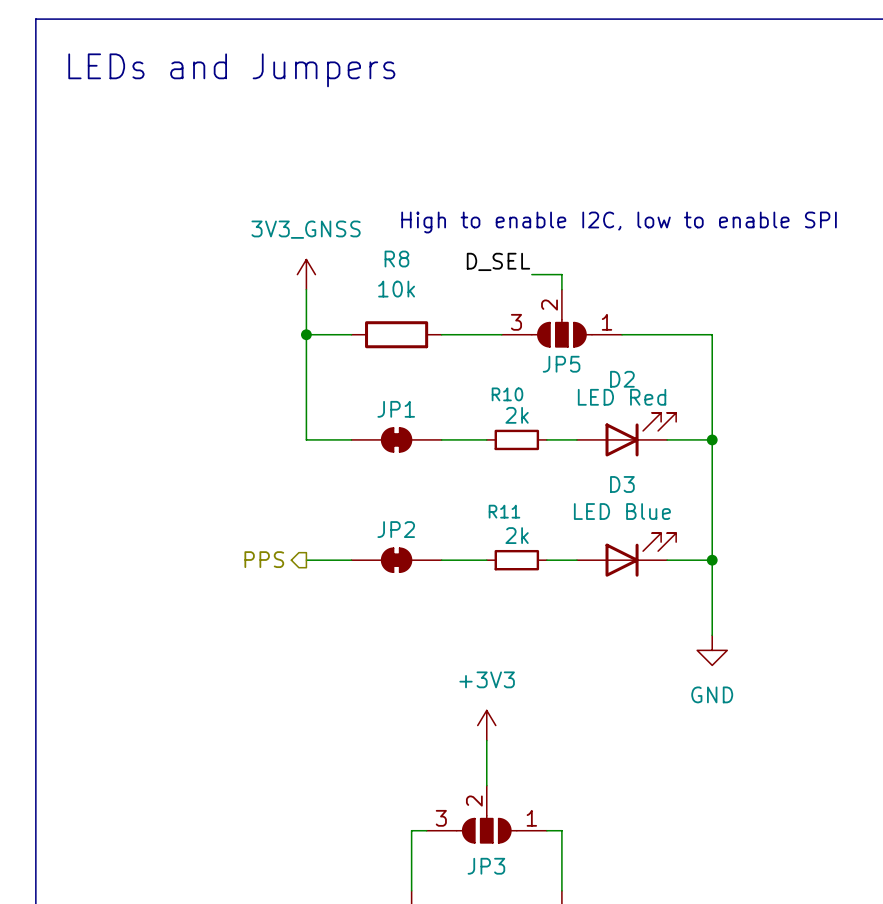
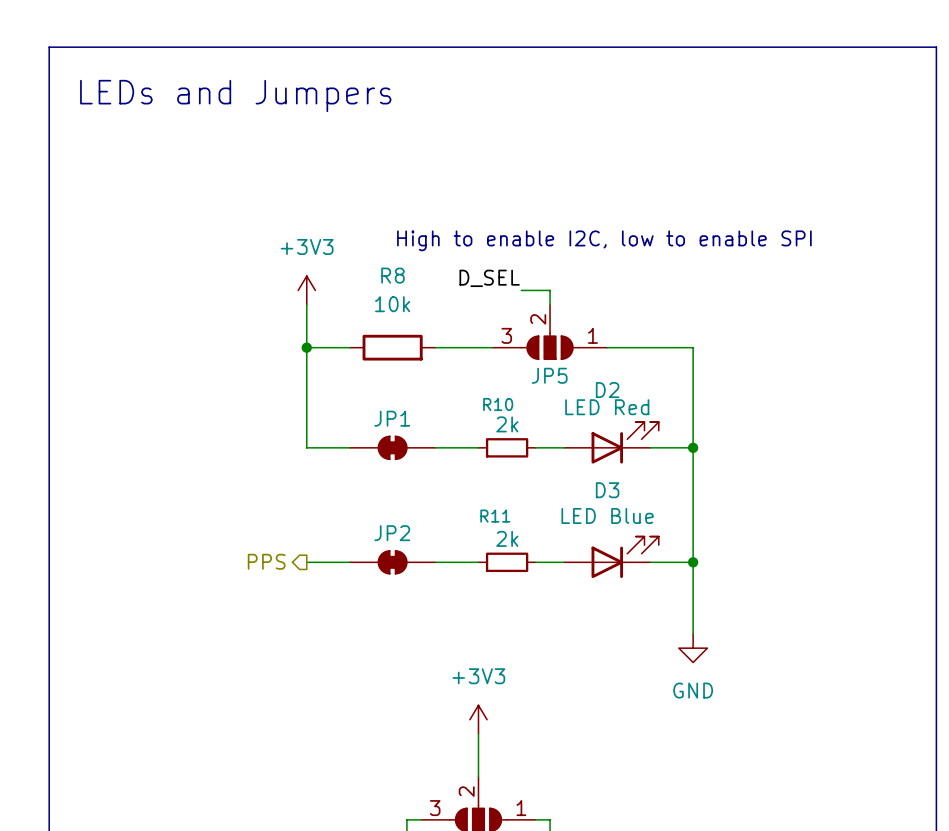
power symbol: 3V3_GNSS (306, 274) -> +3V3 (306, 290)

